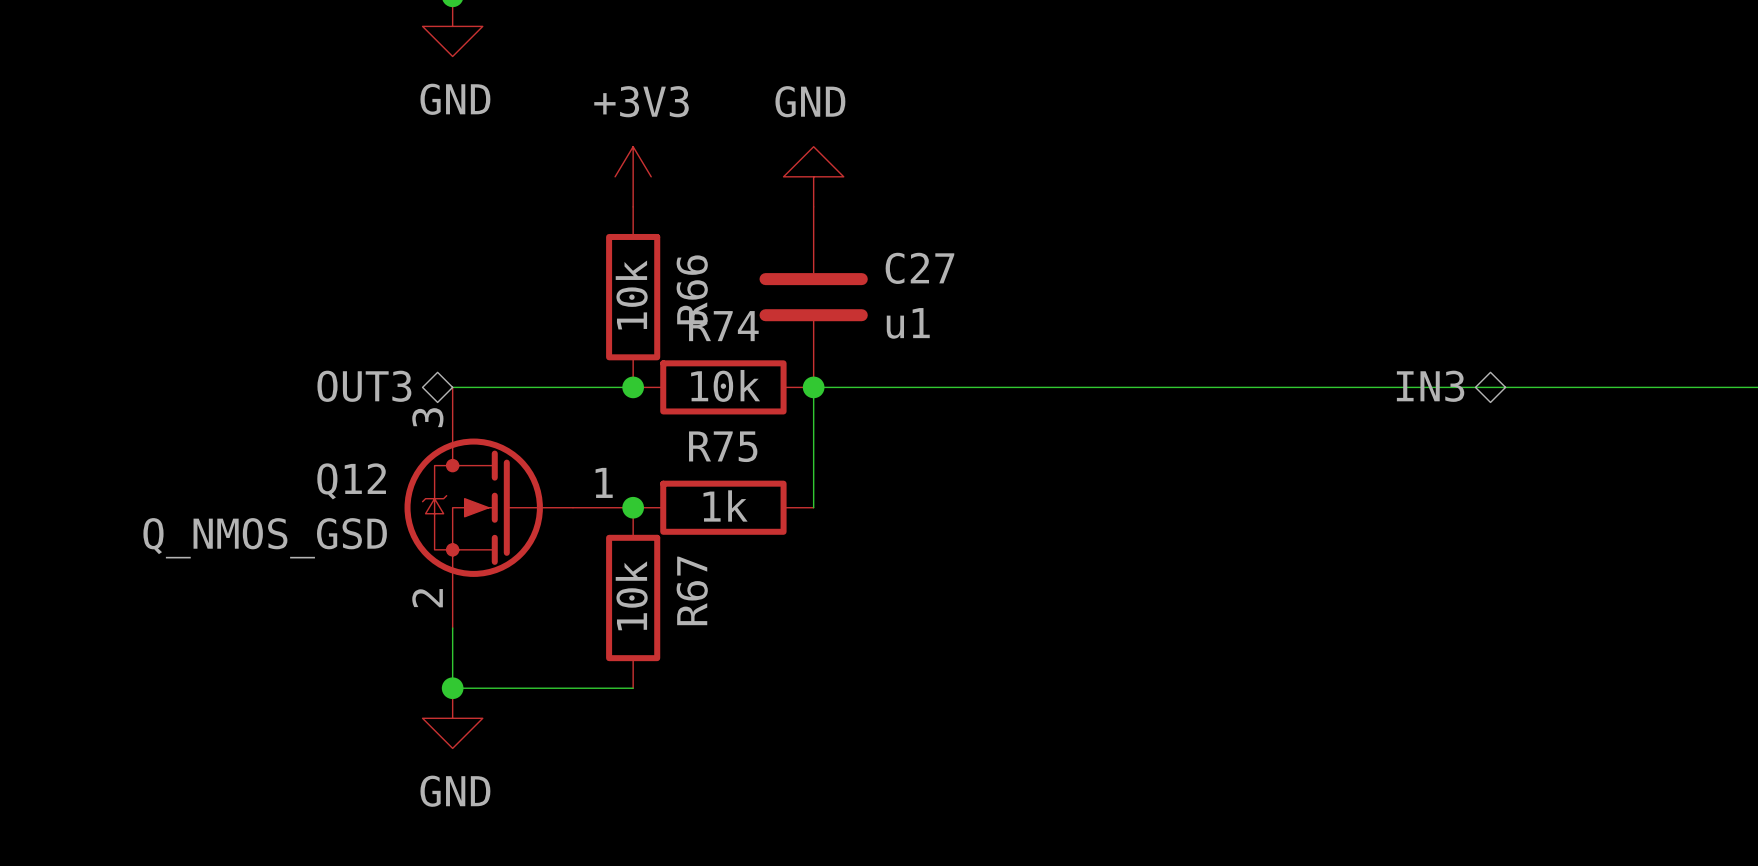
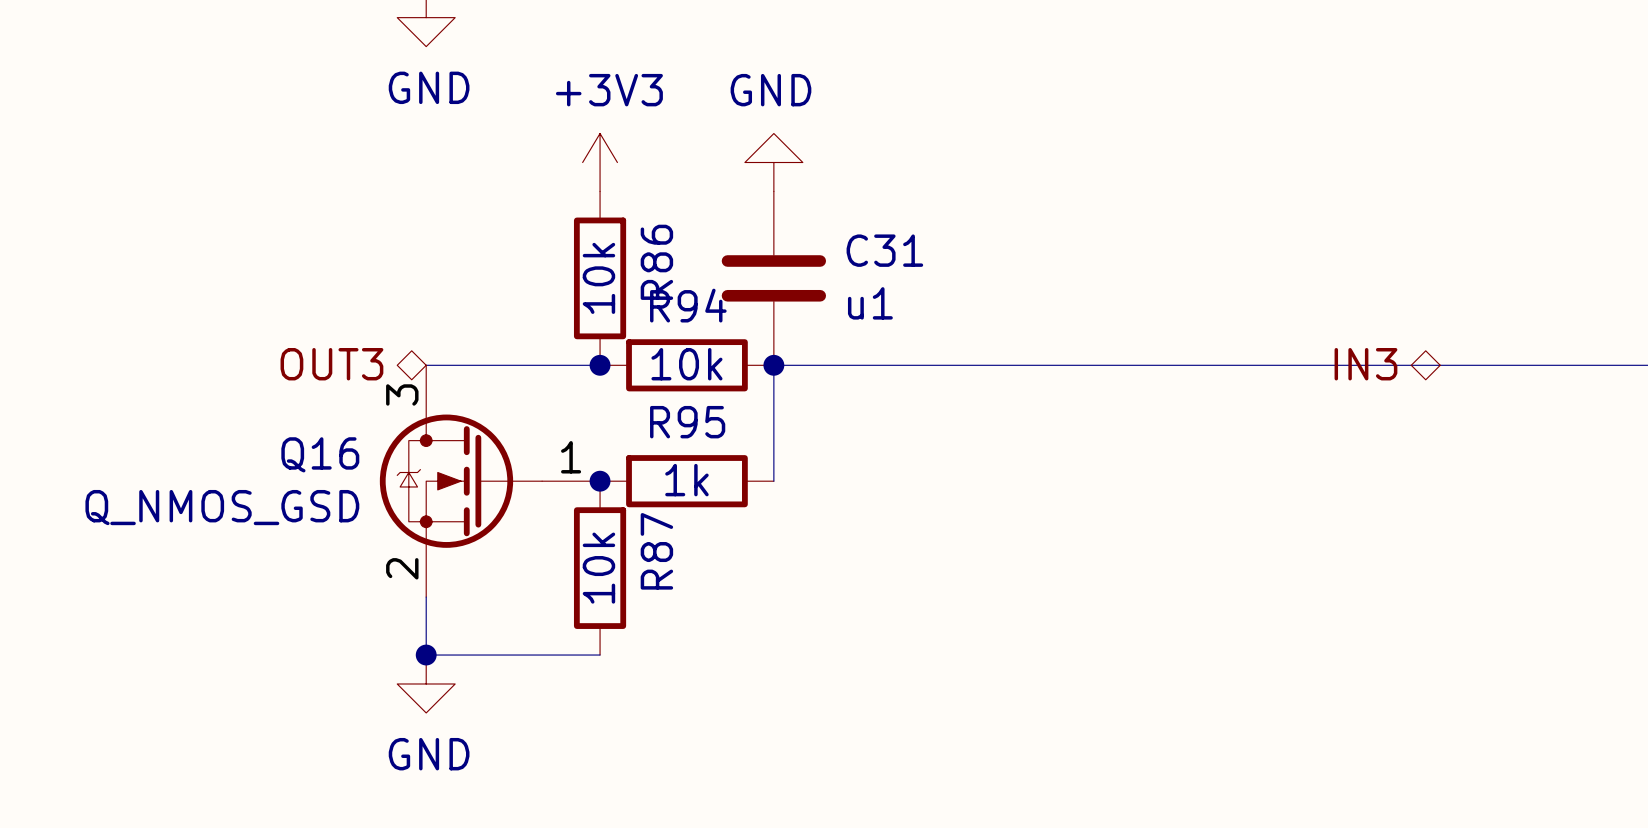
C27 name: C27 (919, 268) -> C31 (884, 250)
R66 name: R66 (692, 289) -> R86 (656, 262)
R74 name: R74 (723, 326) -> R94 (688, 305)
R75 name: R75 (723, 446) -> R95 (687, 422)
Q12 name: Q12 (351, 481) -> Q16 (320, 454)
R67 name: R67 (692, 590) -> R87 (656, 551)

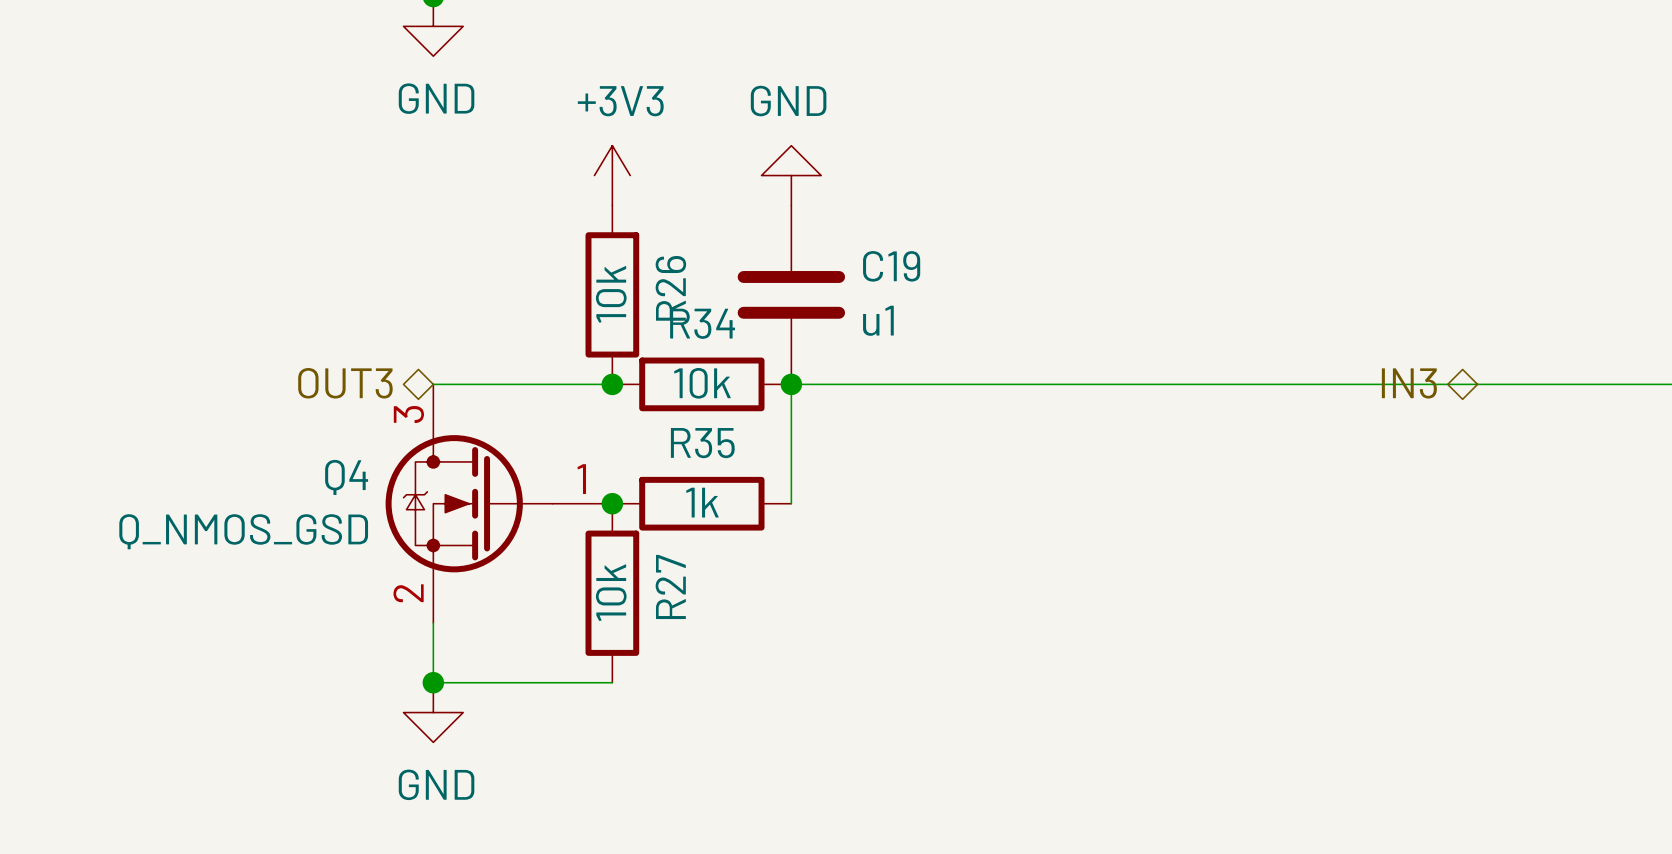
C31 name: C31 (884, 250) -> C19 (891, 266)
R86 name: R86 (656, 262) -> R26 (670, 288)
R94 name: R94 (688, 305) -> R34 (702, 323)
R95 name: R95 (687, 422) -> R35 (702, 443)
Q16 name: Q16 (320, 454) -> Q4 (346, 477)
R87 name: R87 (656, 551) -> R27 (670, 586)

